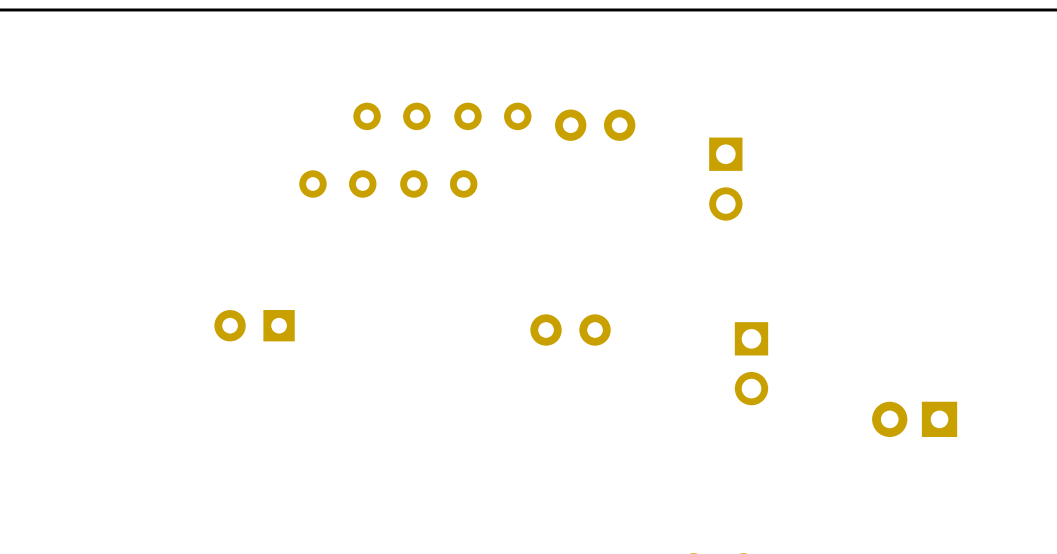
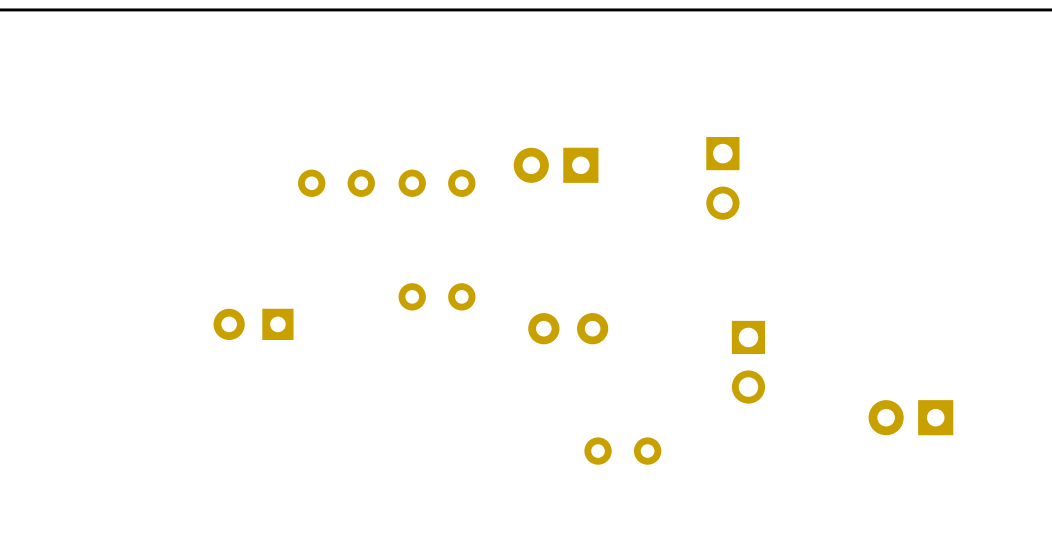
part: (391, 116) -> none
part: (492, 116) -> none
part: (595, 125) -> none
part: none -> (556, 165)
part: none -> (437, 296)
part: none -> (622, 451)

